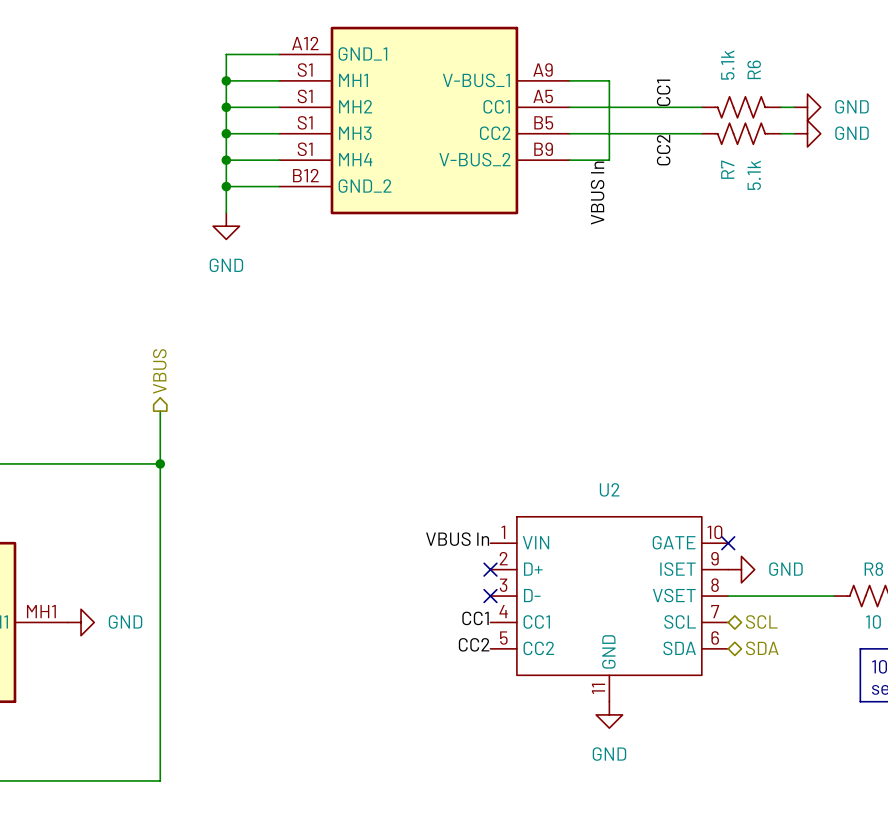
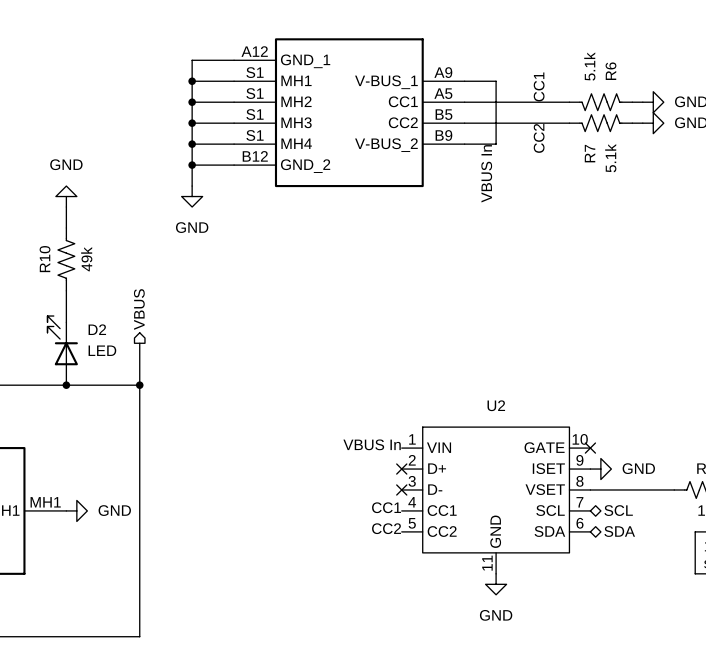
power symbol: none -> GND (66, 196)
wire: none -> (66, 207) (66, 227)
R10: none -> 49k (66, 259)
wire: none -> (66, 290) (66, 322)
D2: none -> LED (62, 350)
junction: none -> (66, 385)

